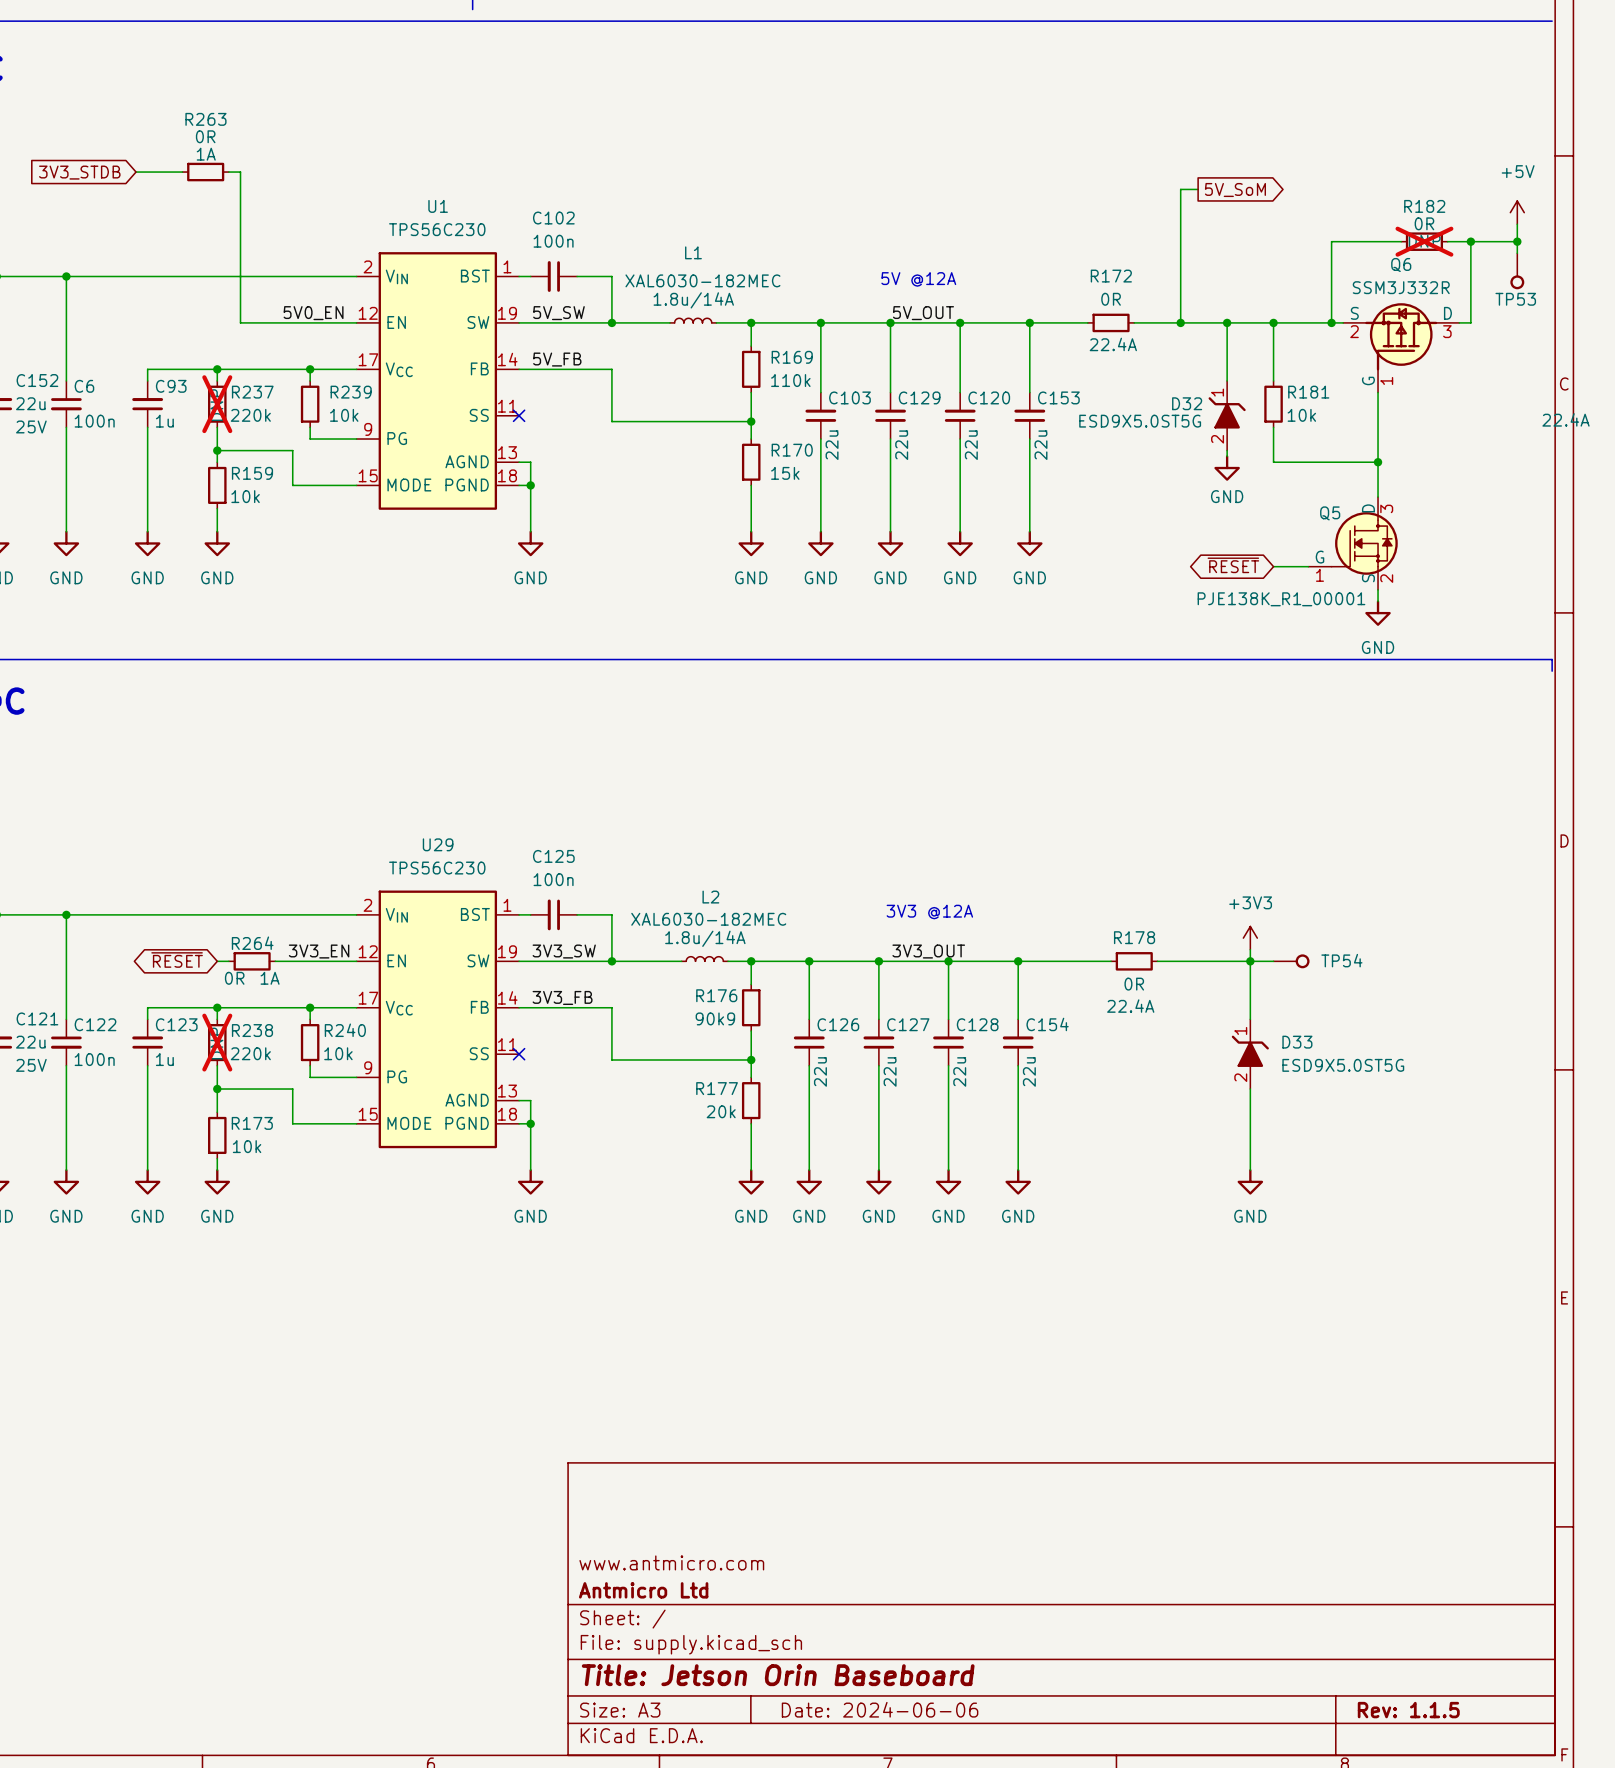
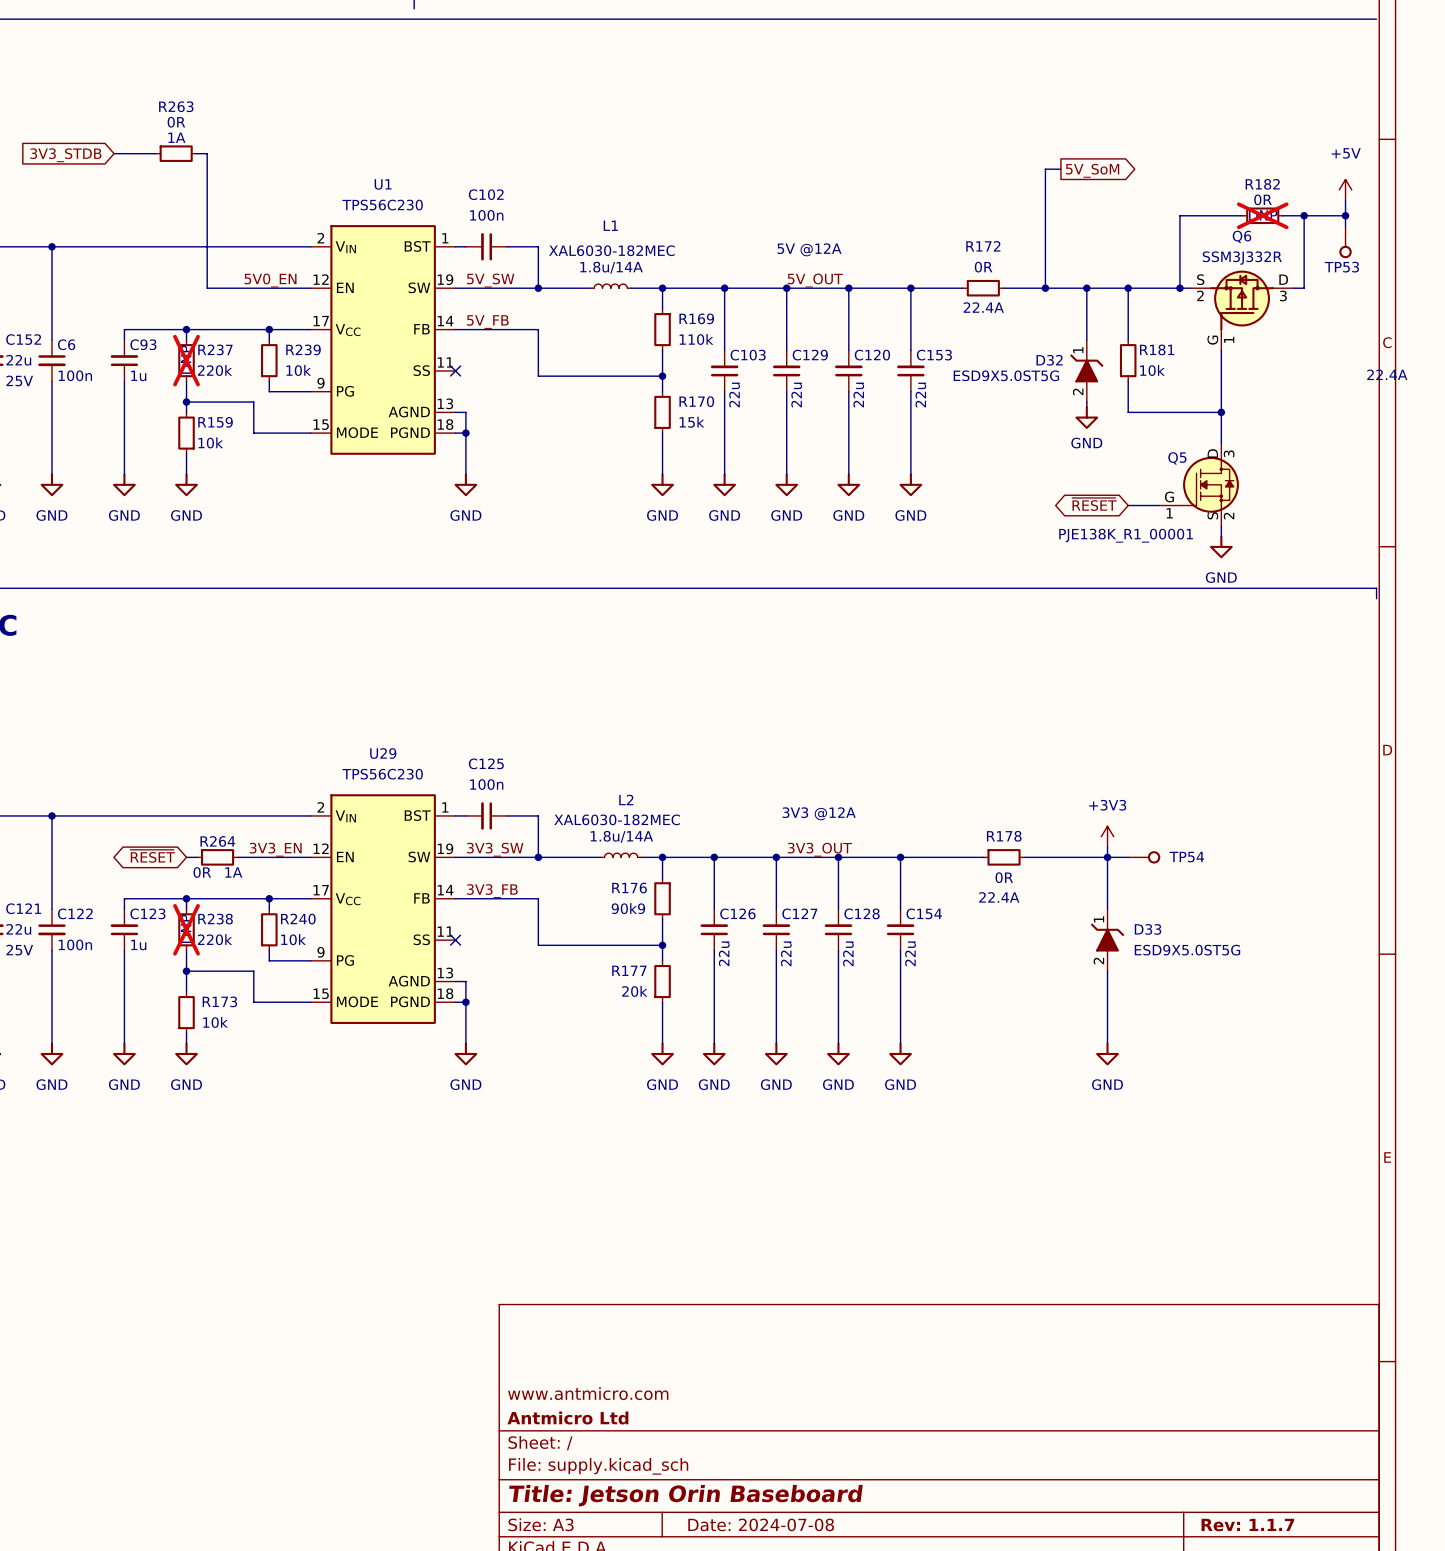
title block: Date: 2024-06-06 (880, 1709) -> Date: 2024-07-08 (761, 1524)
title block: Rev: 1.1.5 (1408, 1710) -> Rev: 1.1.7 (1247, 1525)

